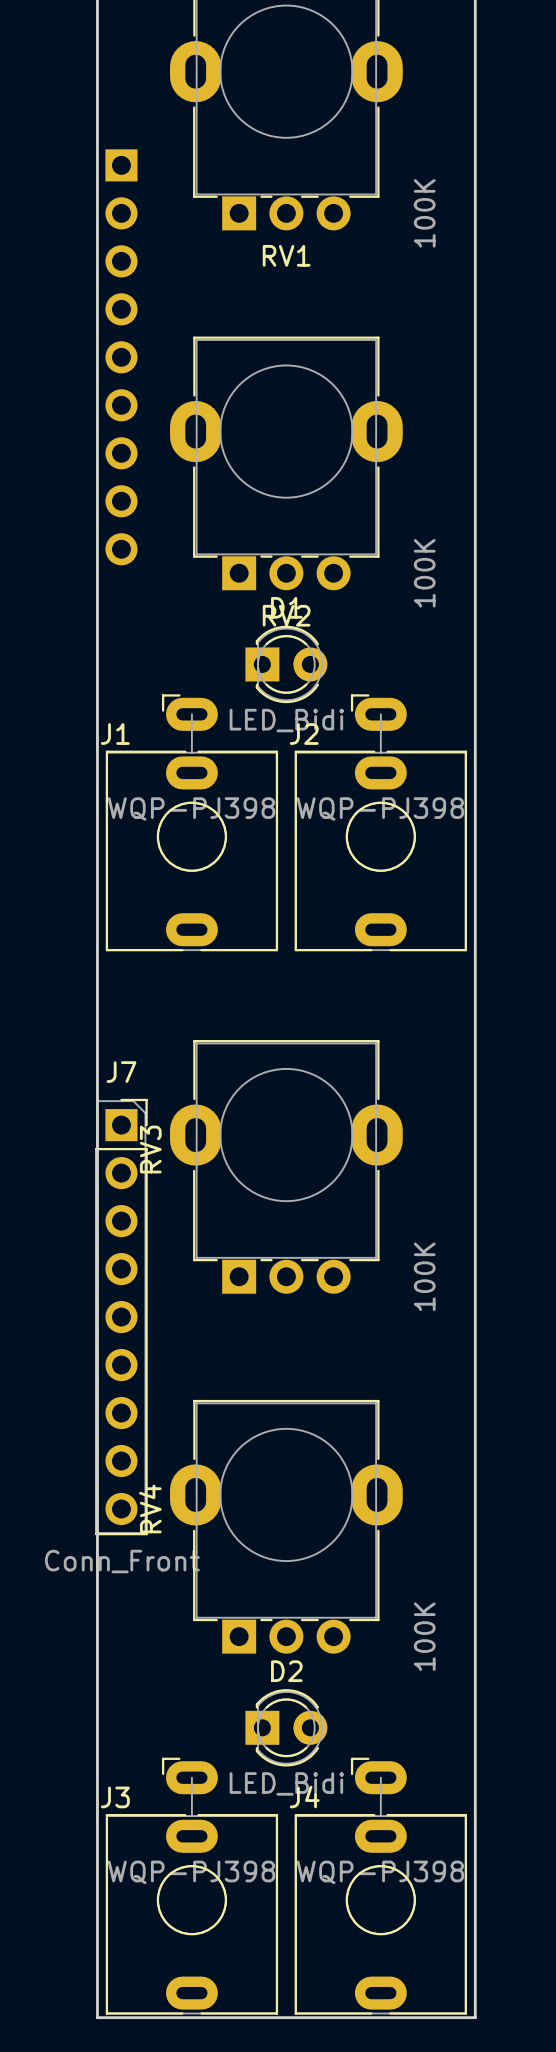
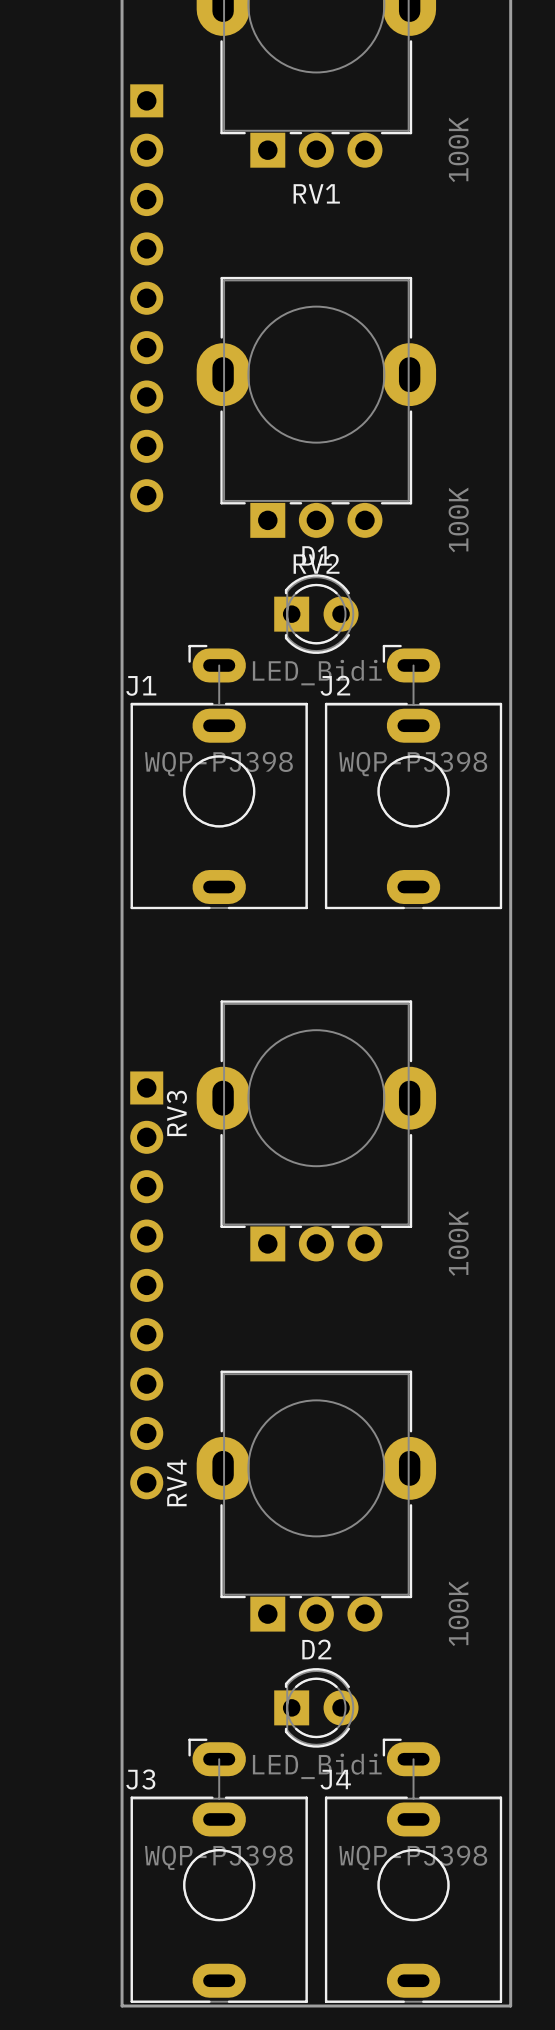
J7 side: top (121, 1317) -> bottom (146, 1285)

